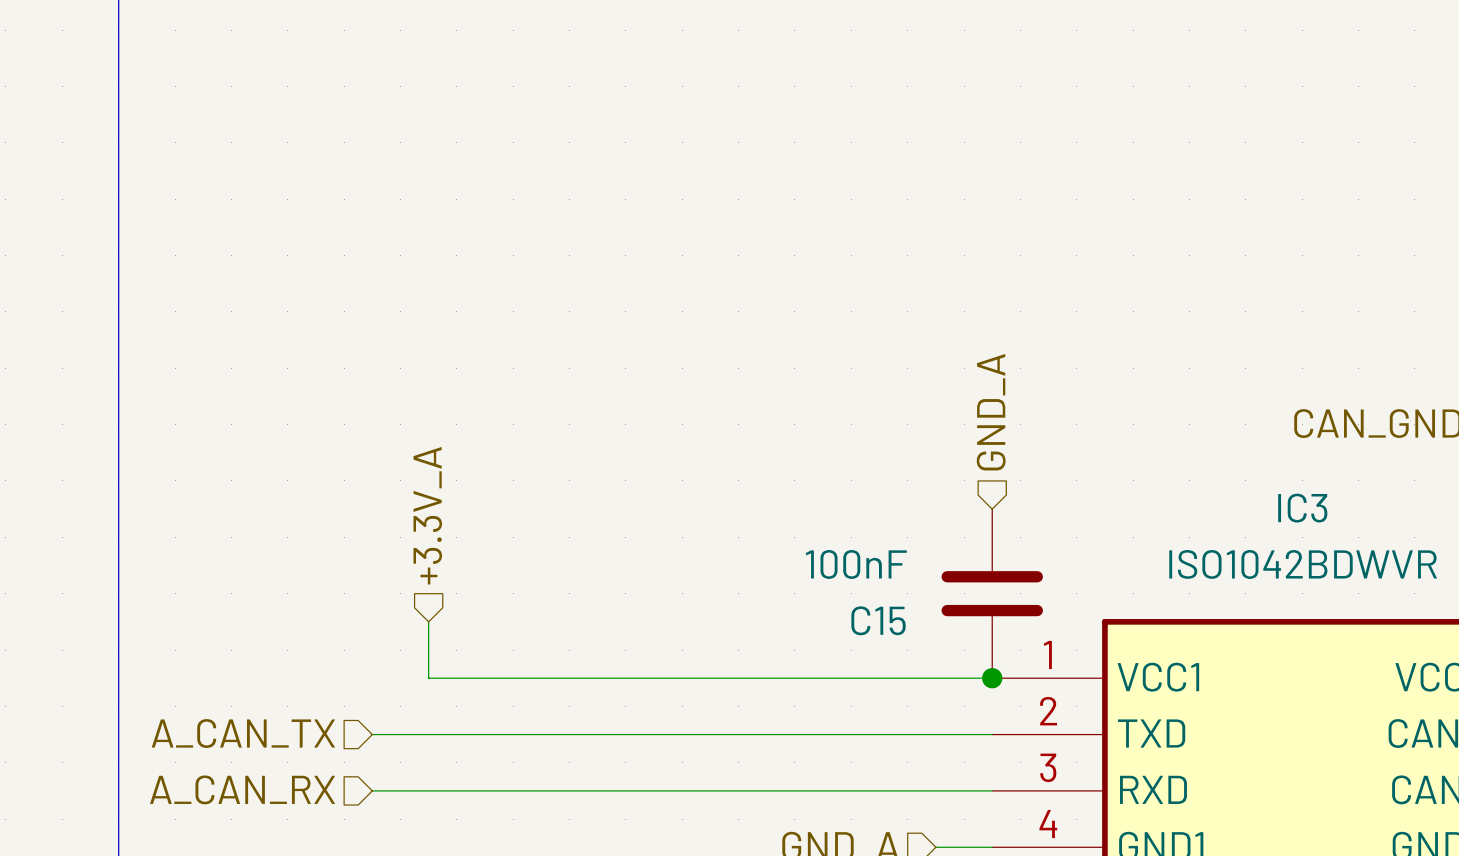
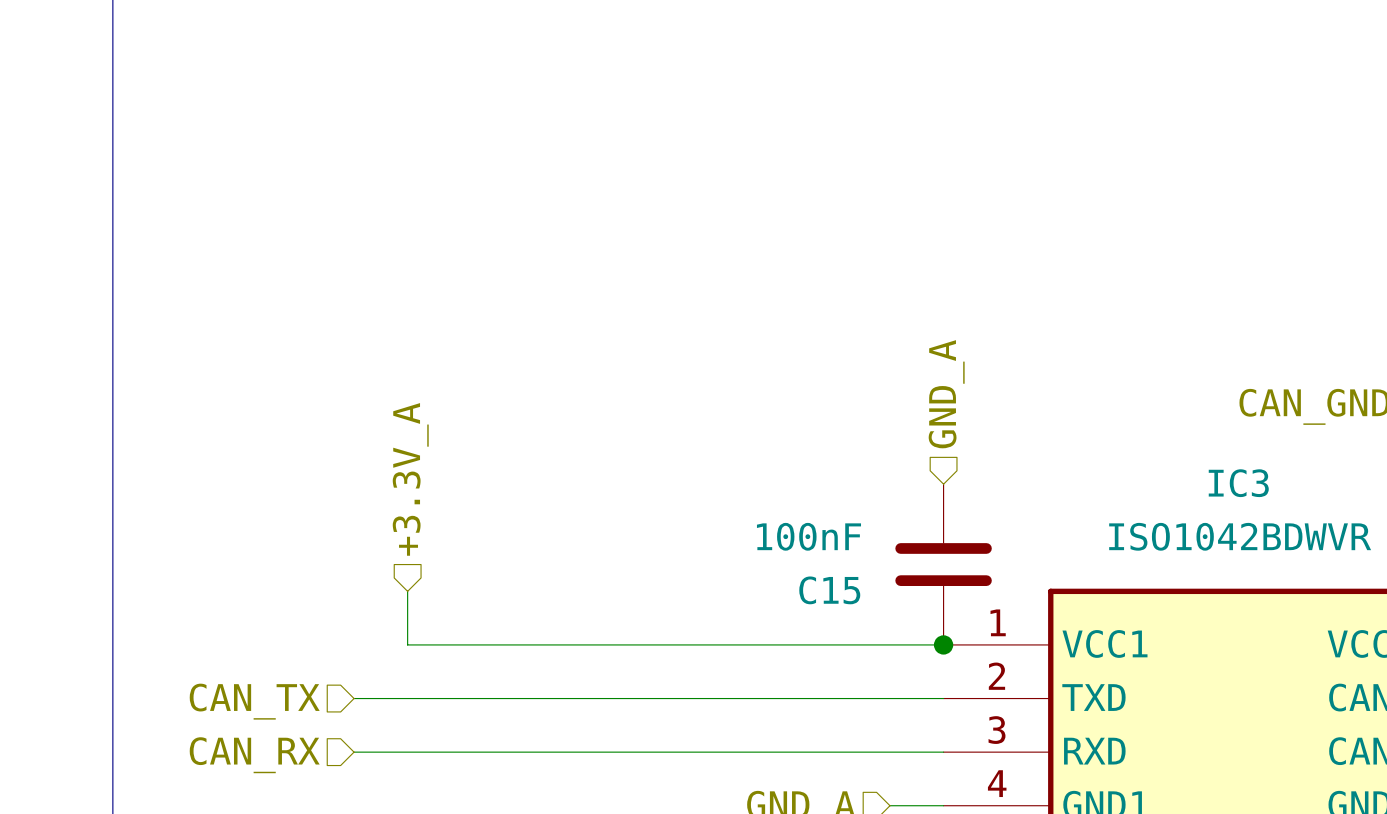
hierarchical label: A_CAN_TX (243, 733) -> CAN_TX (254, 701)
hierarchical label: A_CAN_RX (242, 789) -> CAN_RX (254, 755)

